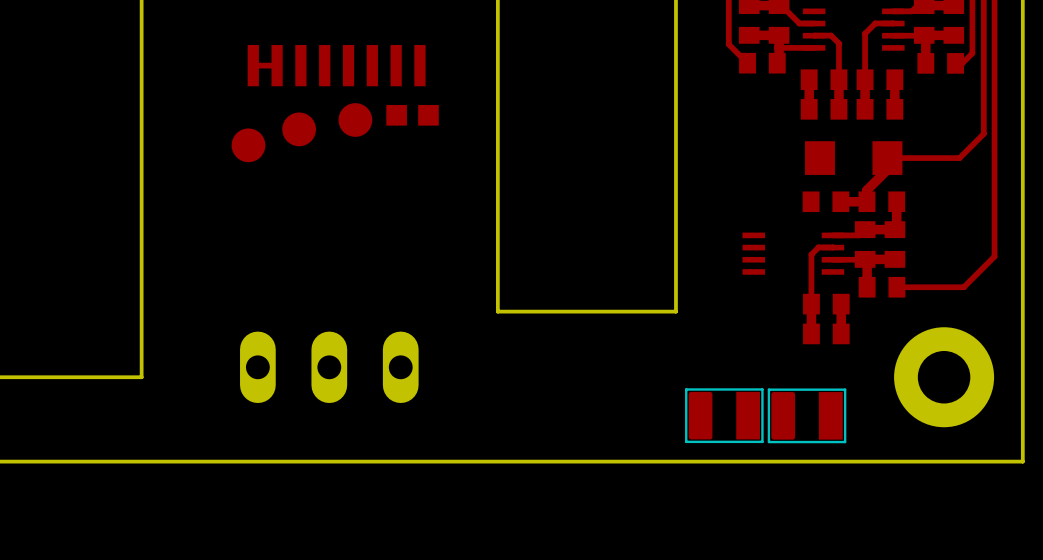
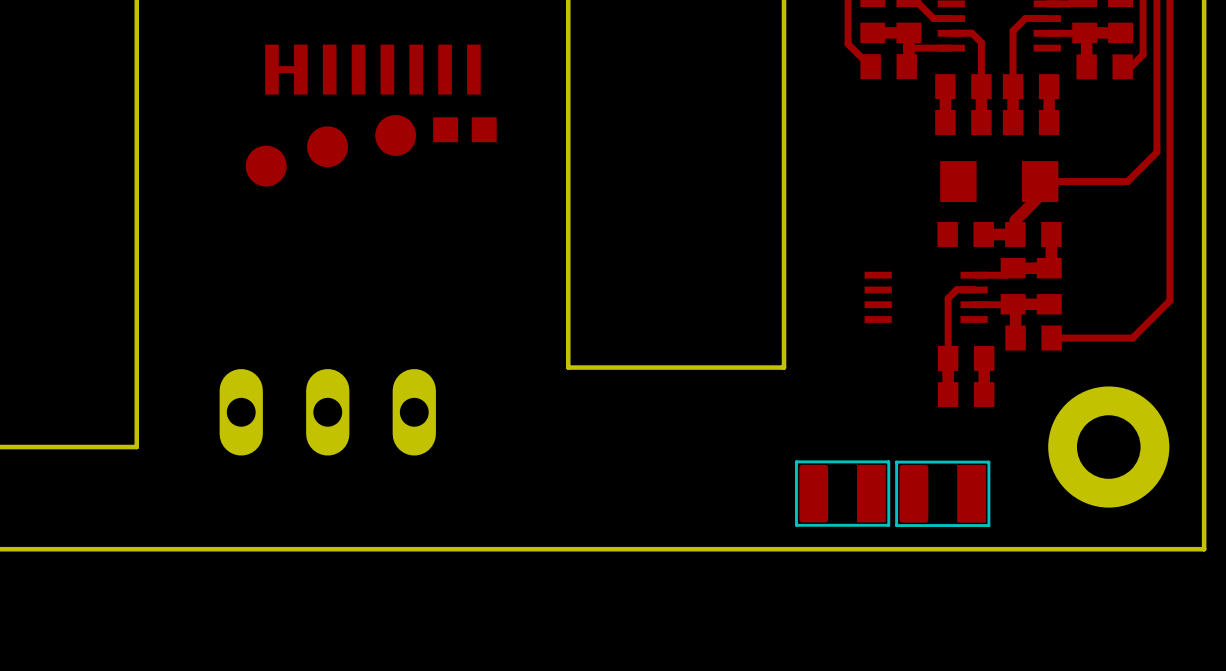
part position: (329, 367) -> (327, 412)

